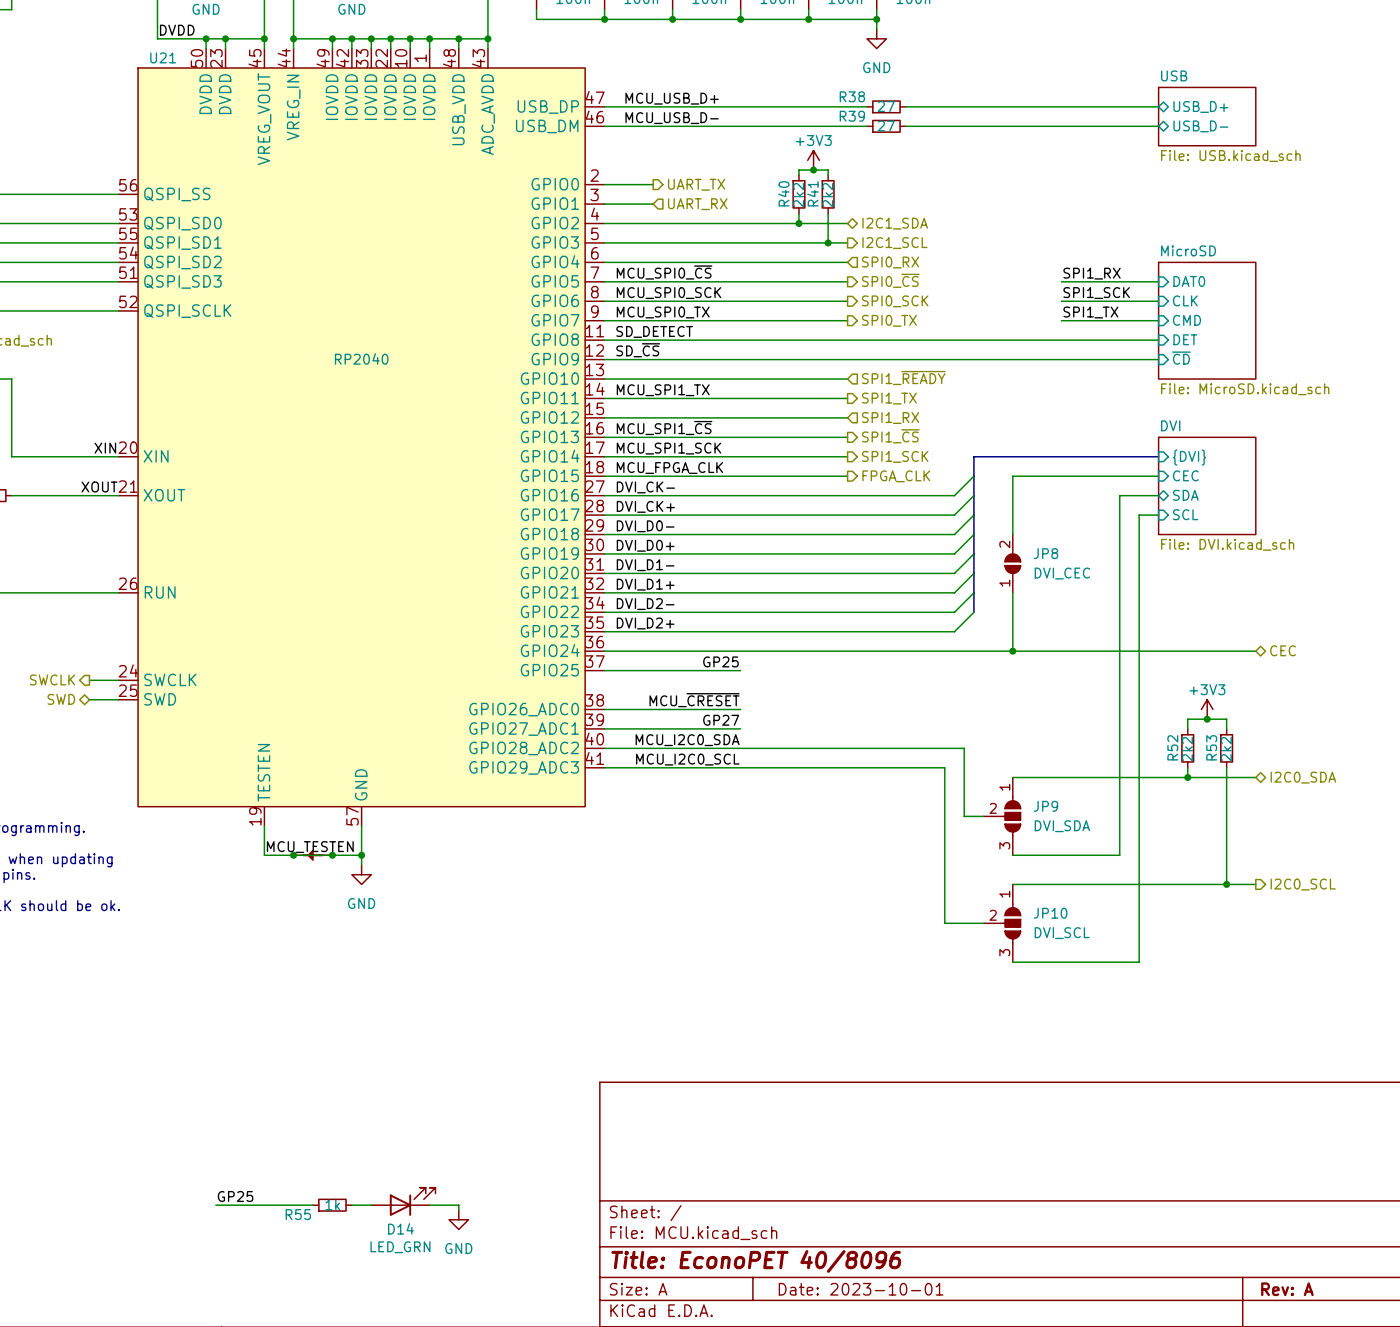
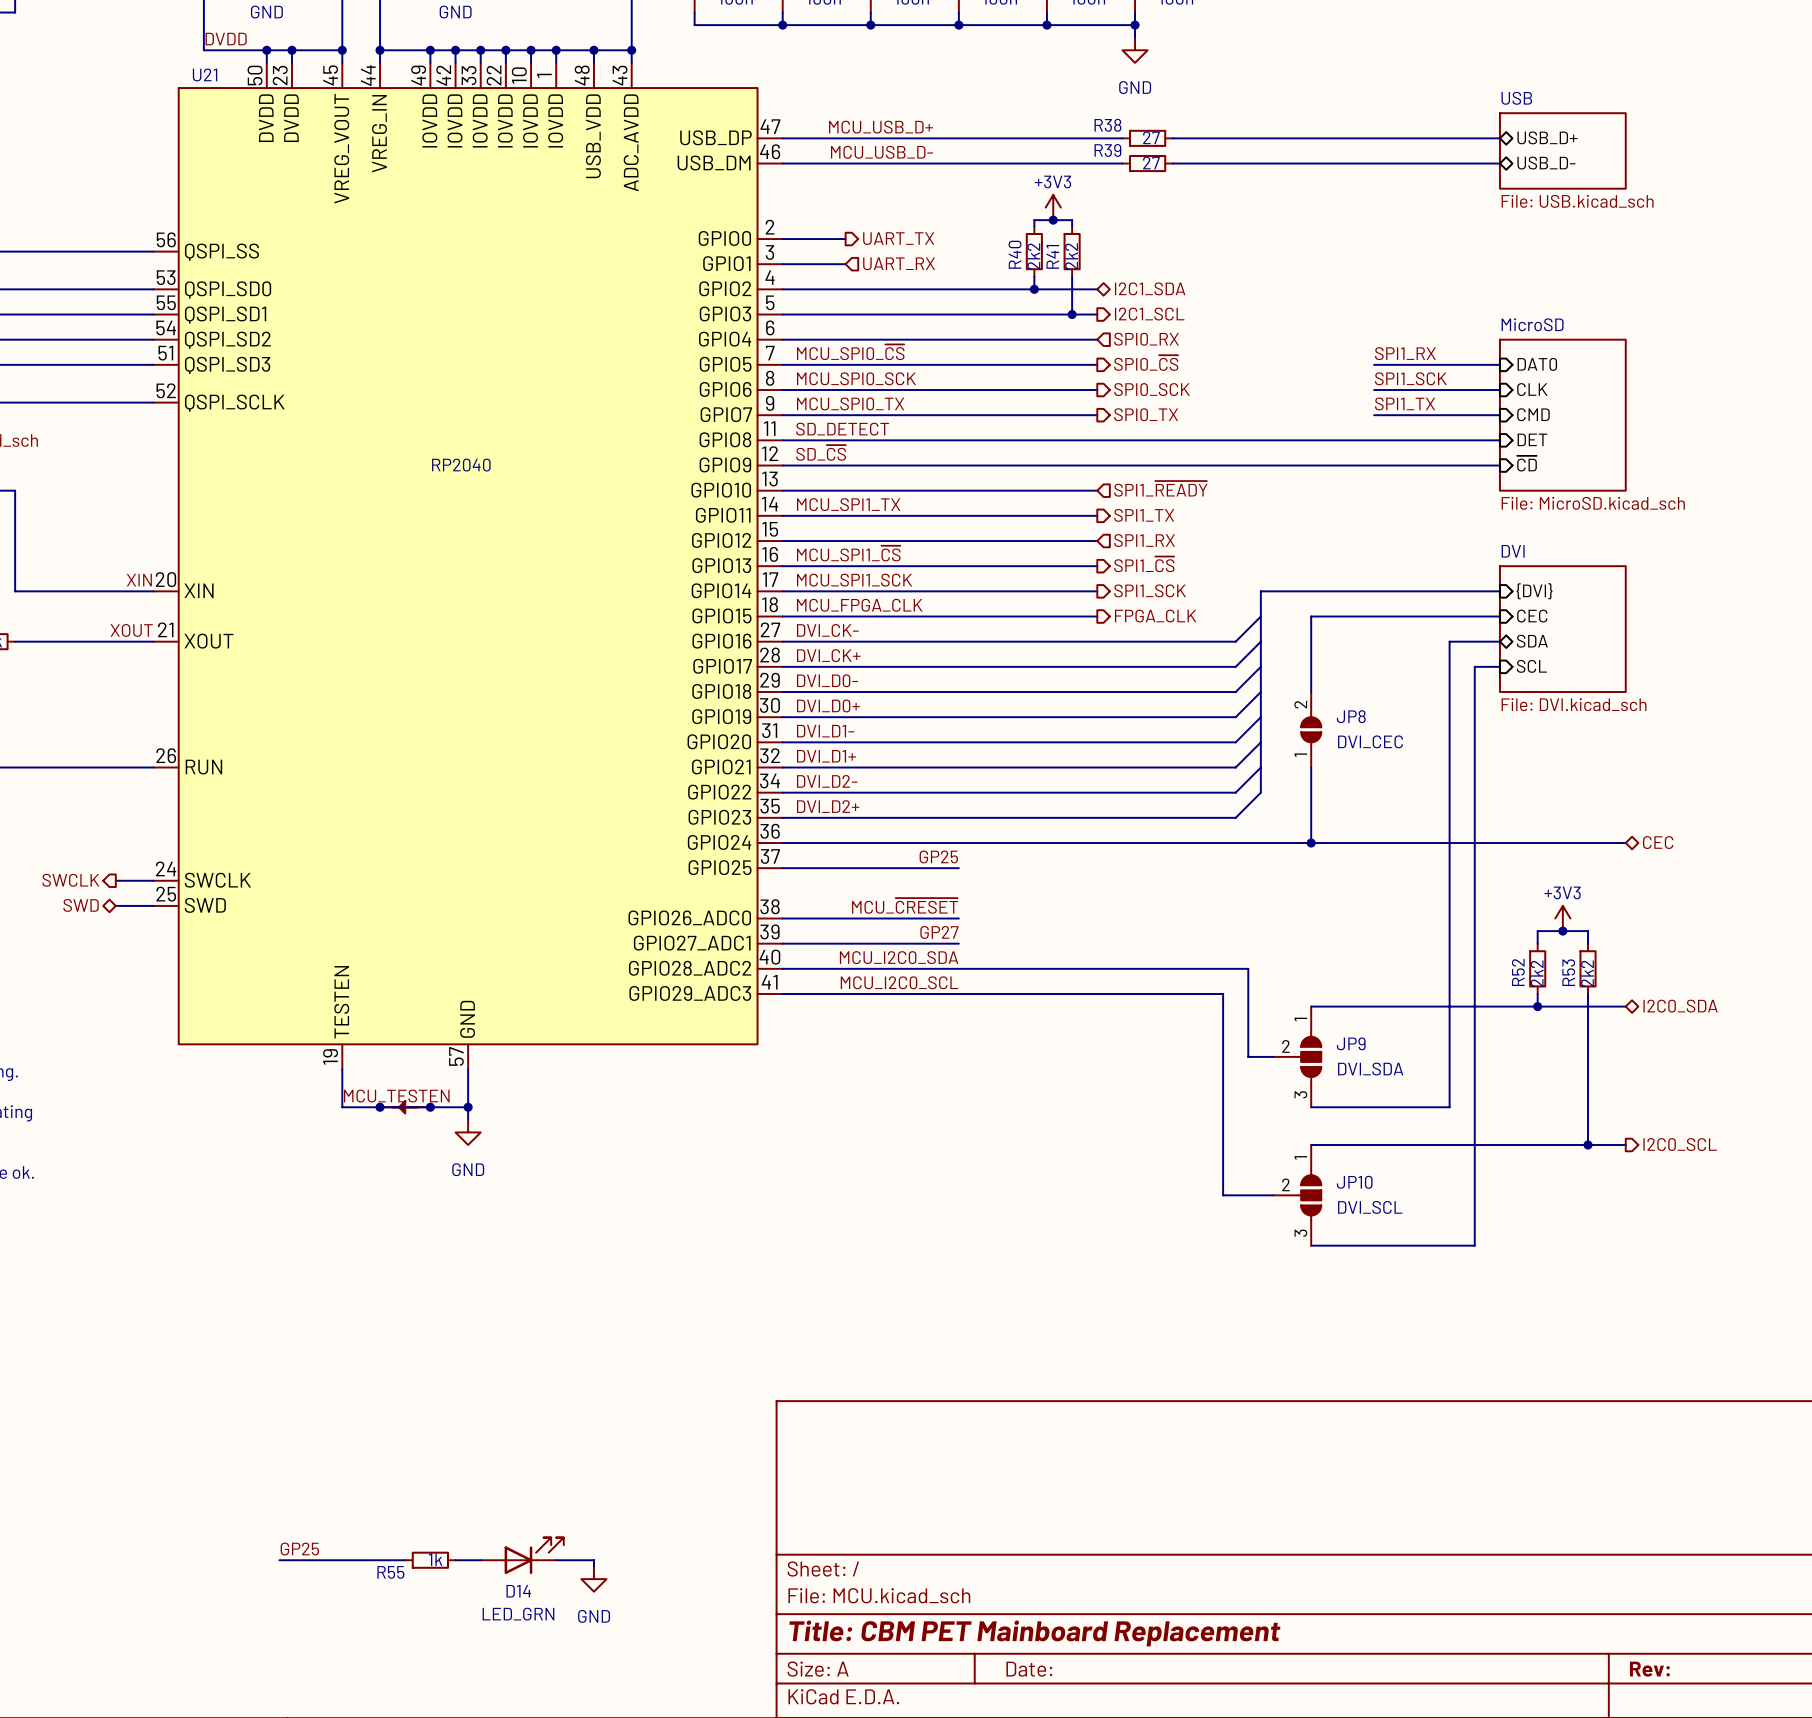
title block: Title: EconoPET 40/8096 (756, 1261) -> Title: CBM PET Mainboard Replacement (1034, 1633)
title block: Date: 2023-10-01 (861, 1289) -> Date: (1029, 1669)
title block: Rev: A (1287, 1289) -> Rev: (1649, 1669)

